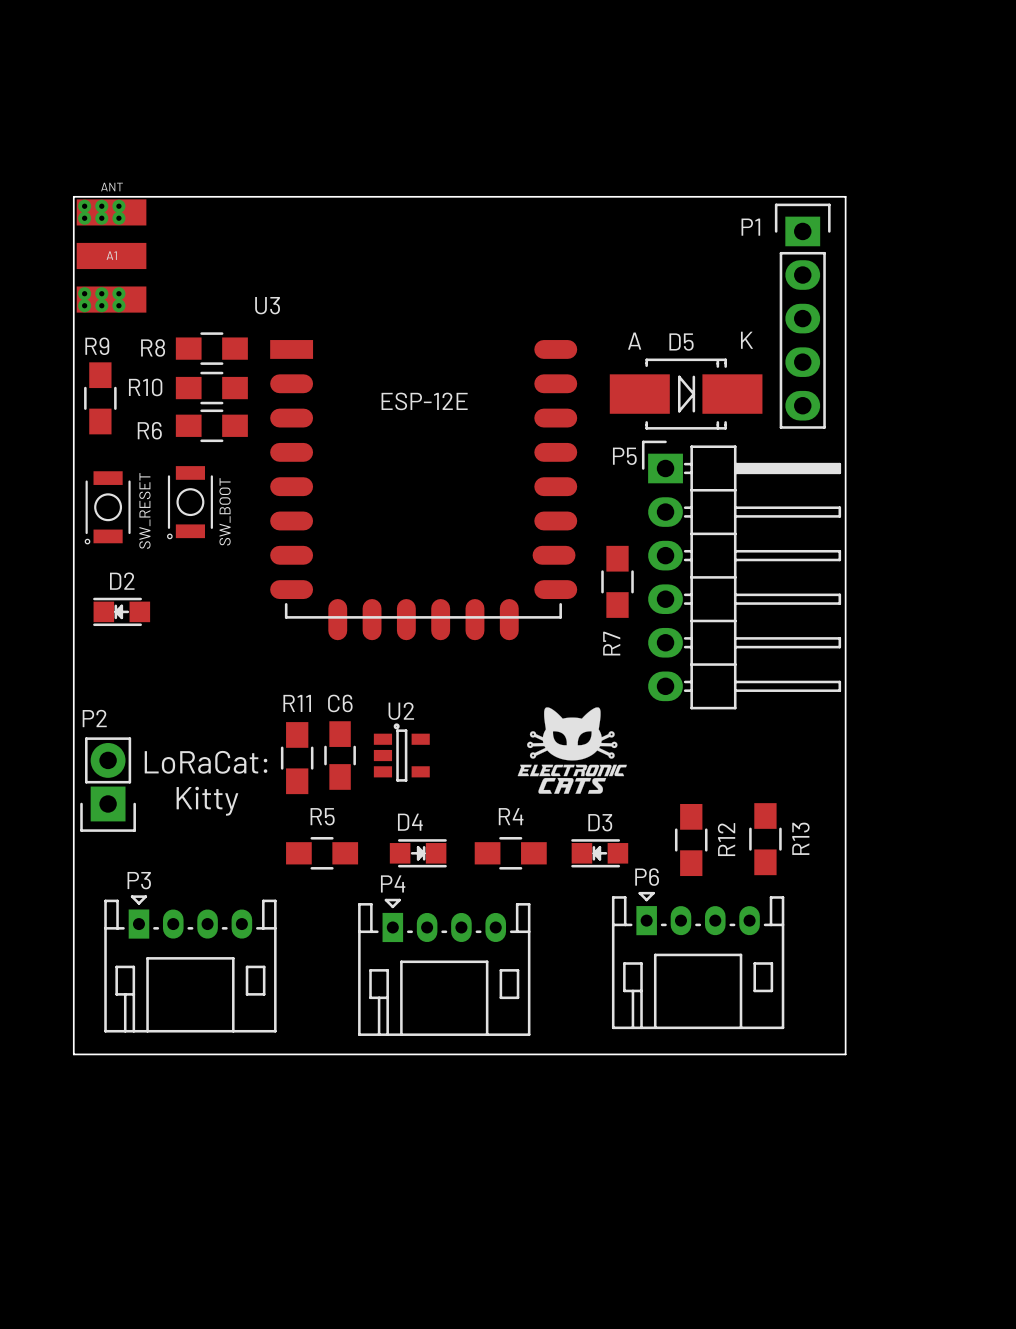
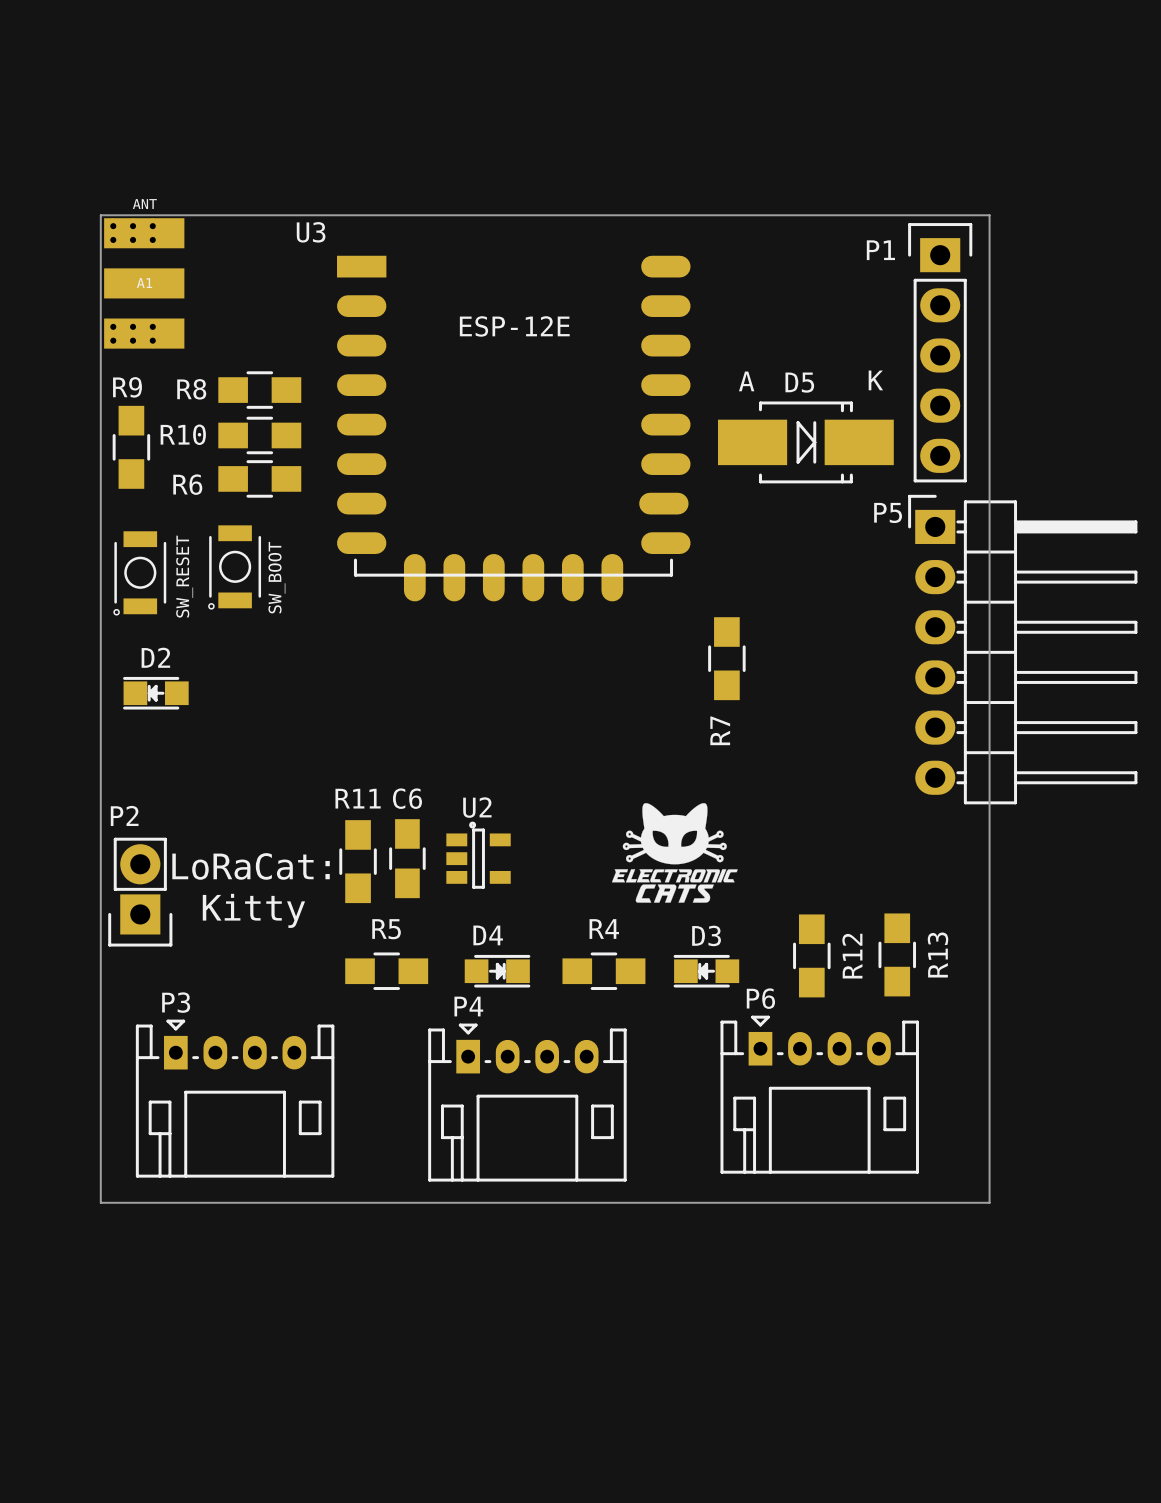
U3 name position: U3 (267, 305) -> U3 (311, 232)
U3 position: (423, 490) -> (513, 428)
P5 position: (741, 575) -> (1022, 649)

